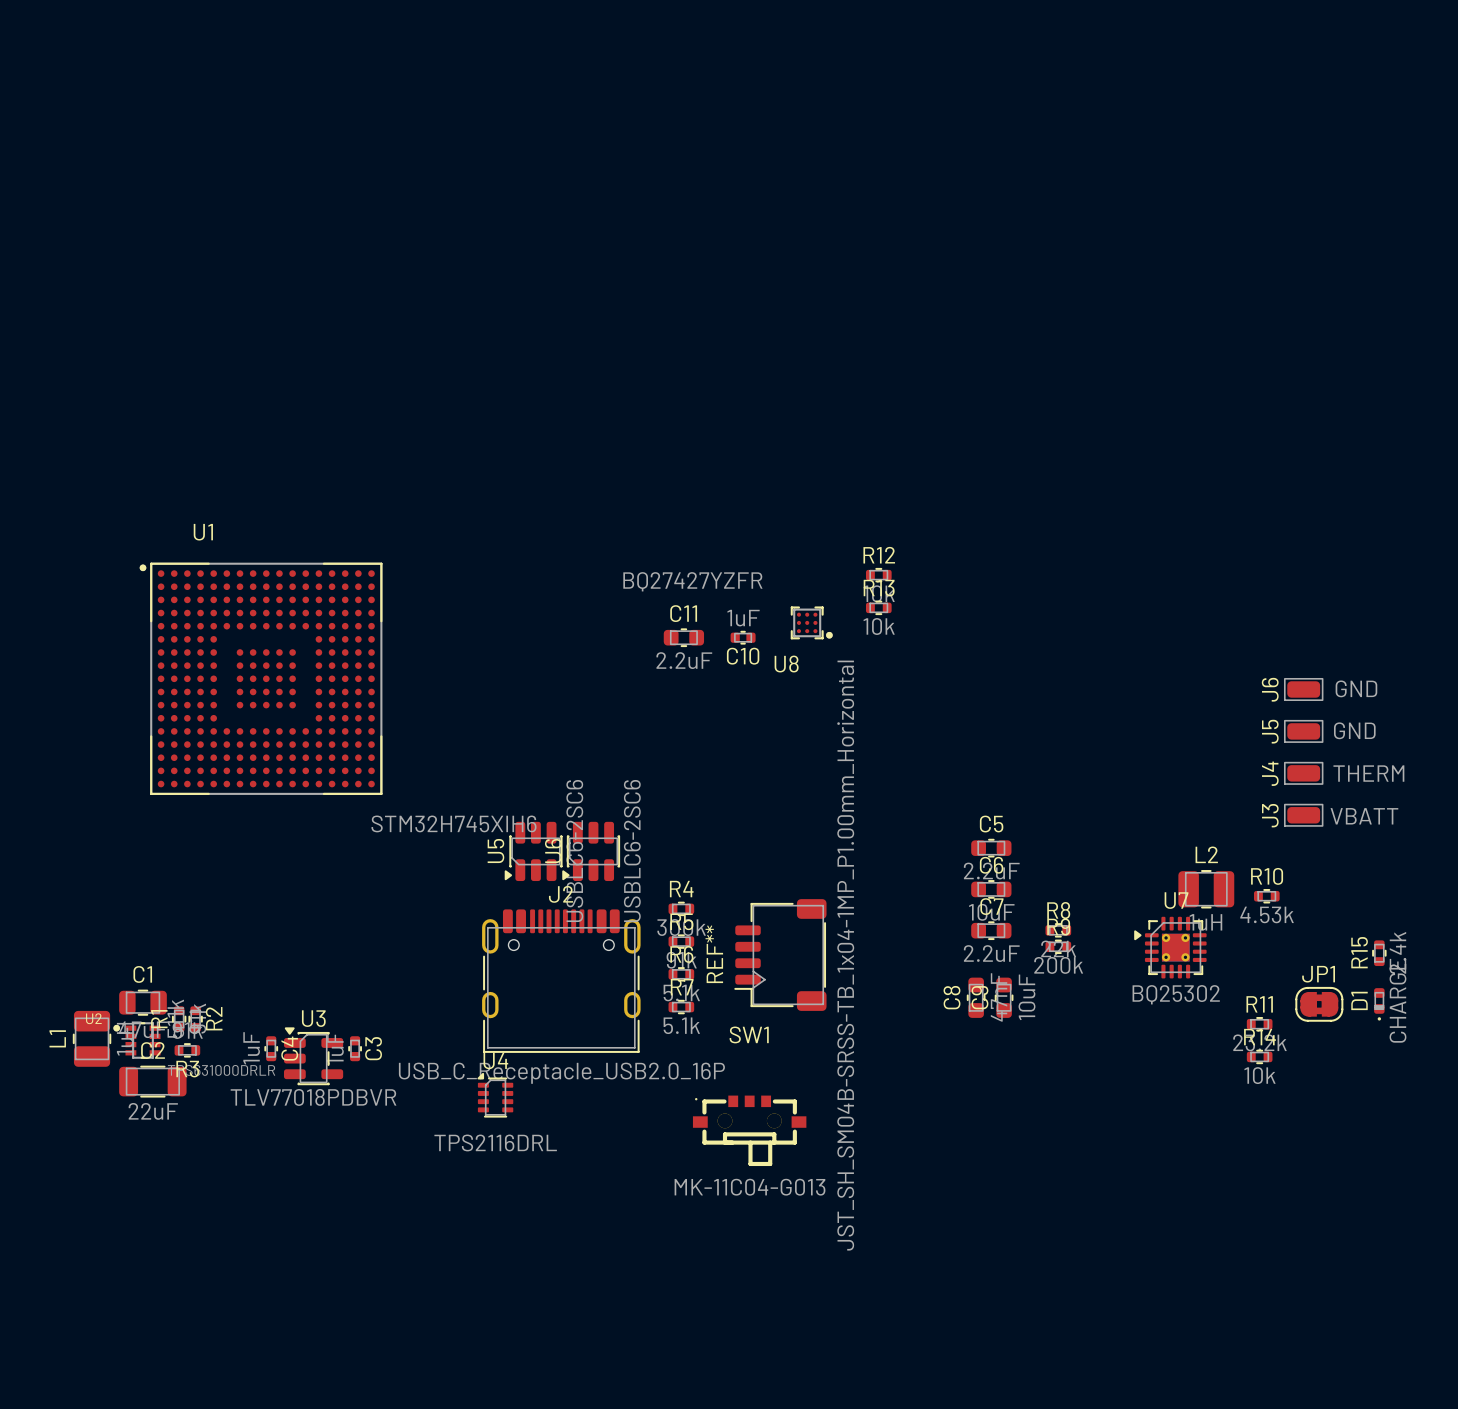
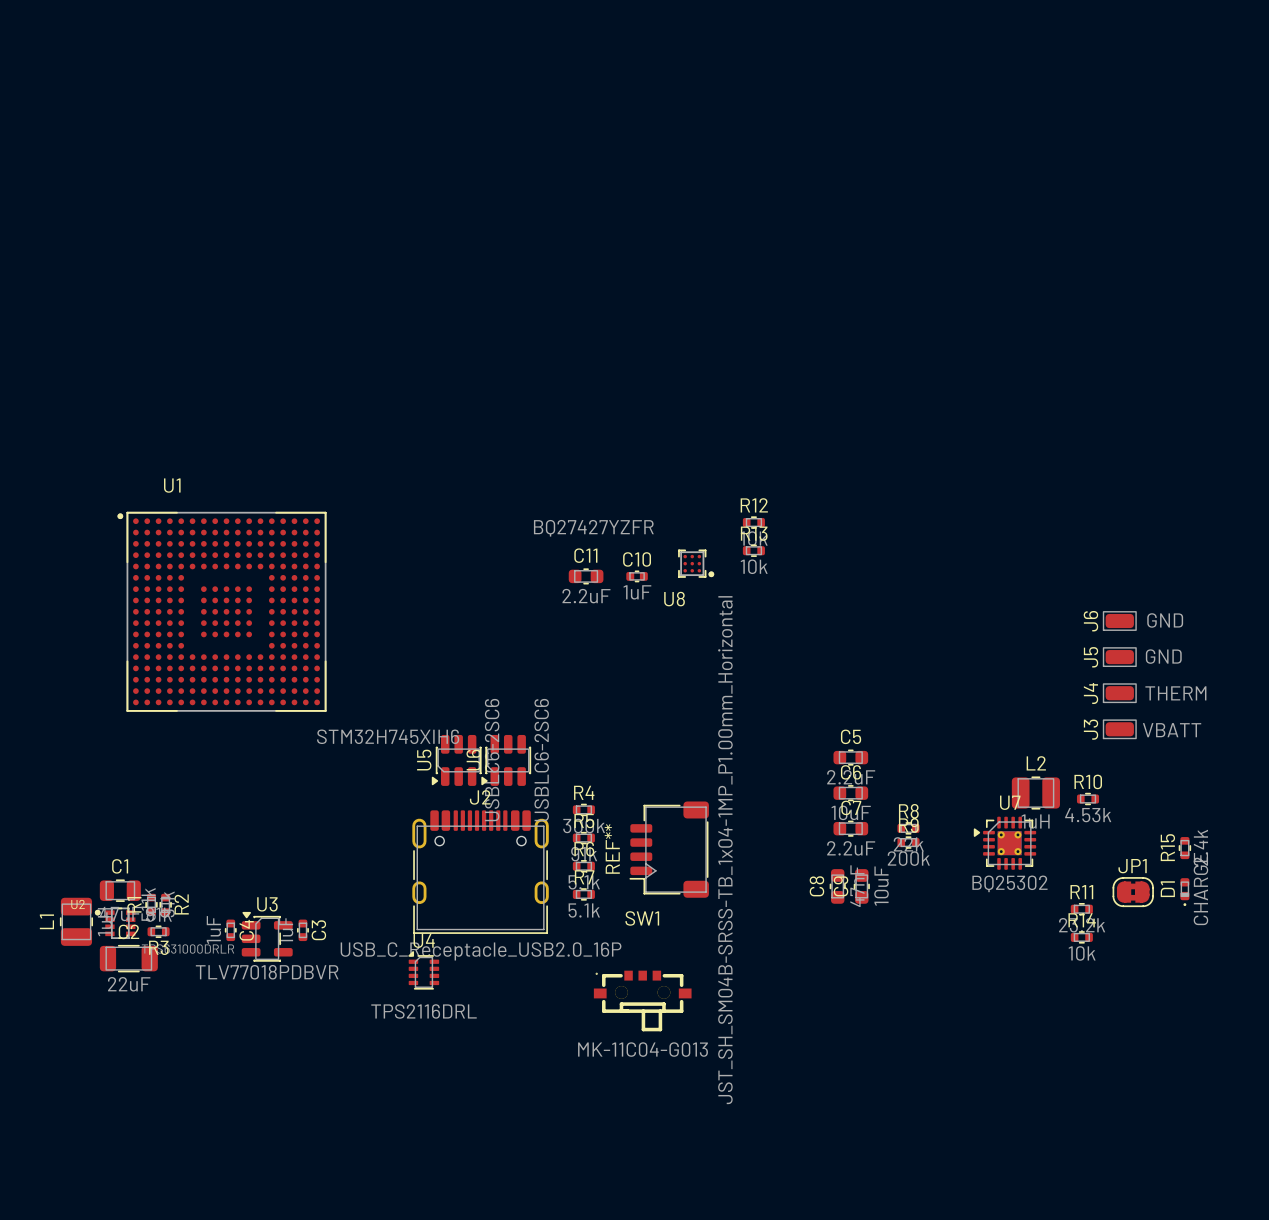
C10 value position: 1uF (743, 618) -> 1uF (637, 592)
C10 name position: C10 (743, 656) -> C10 (637, 559)

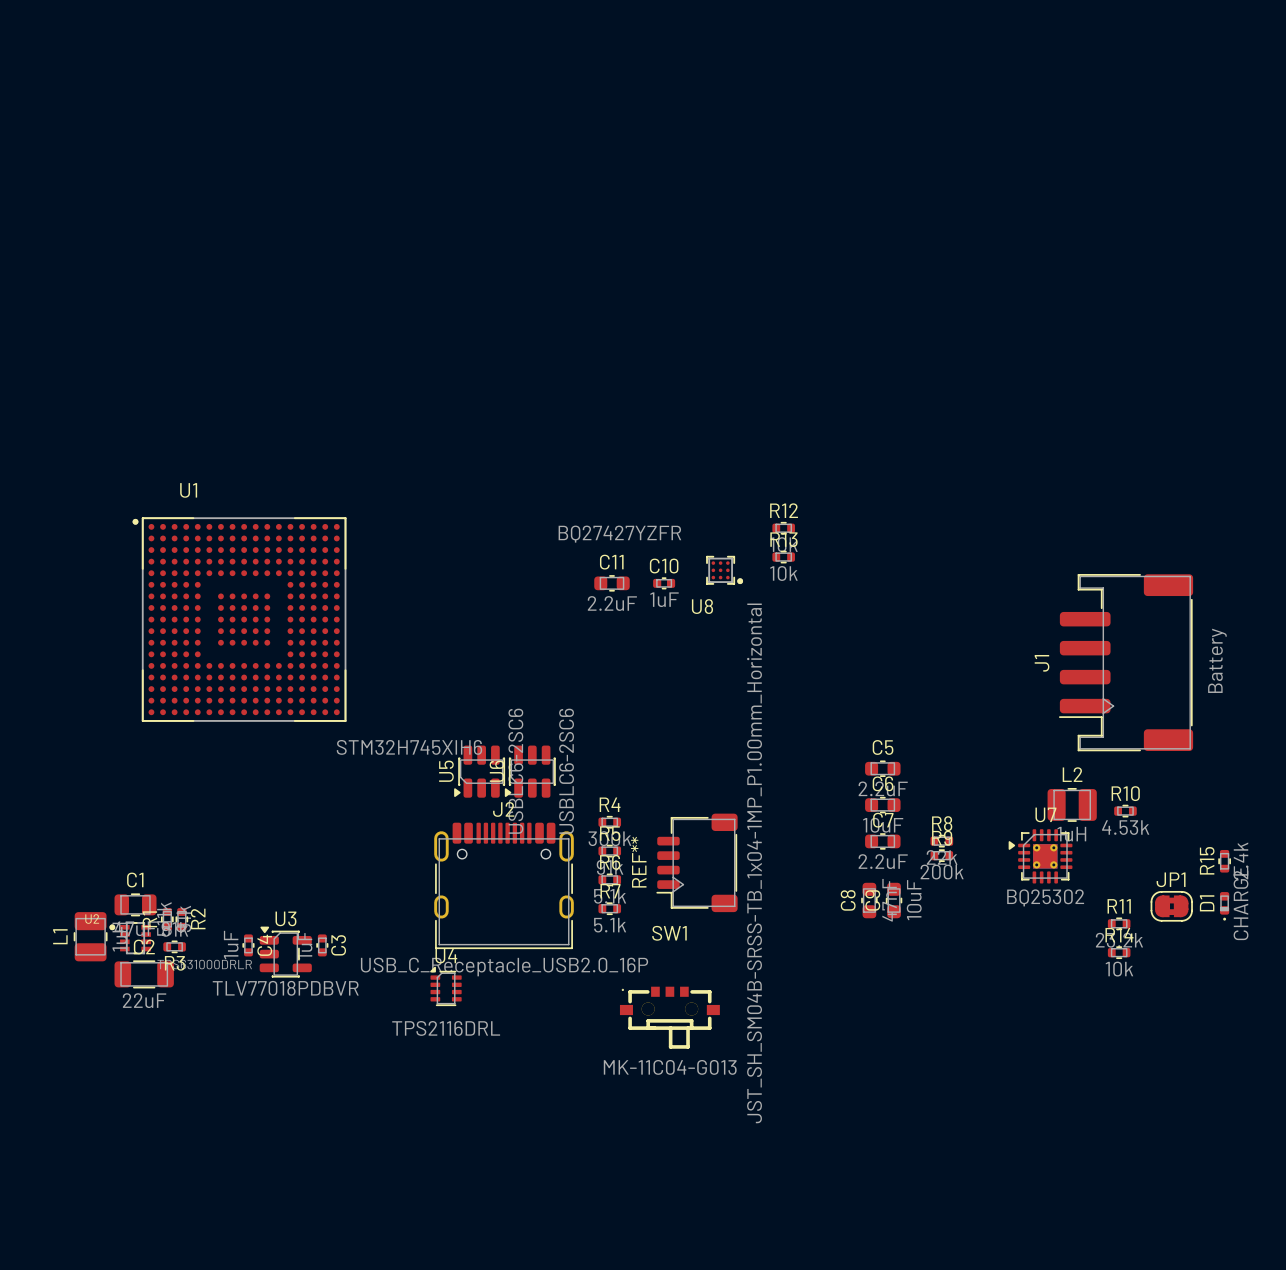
J6: GND (1119, 621) -> none
J1: none -> Battery (1126, 662)
J5: GND (1119, 657) -> none
J4: THERM (1119, 693) -> none
J3: VBATT (1119, 729) -> none

